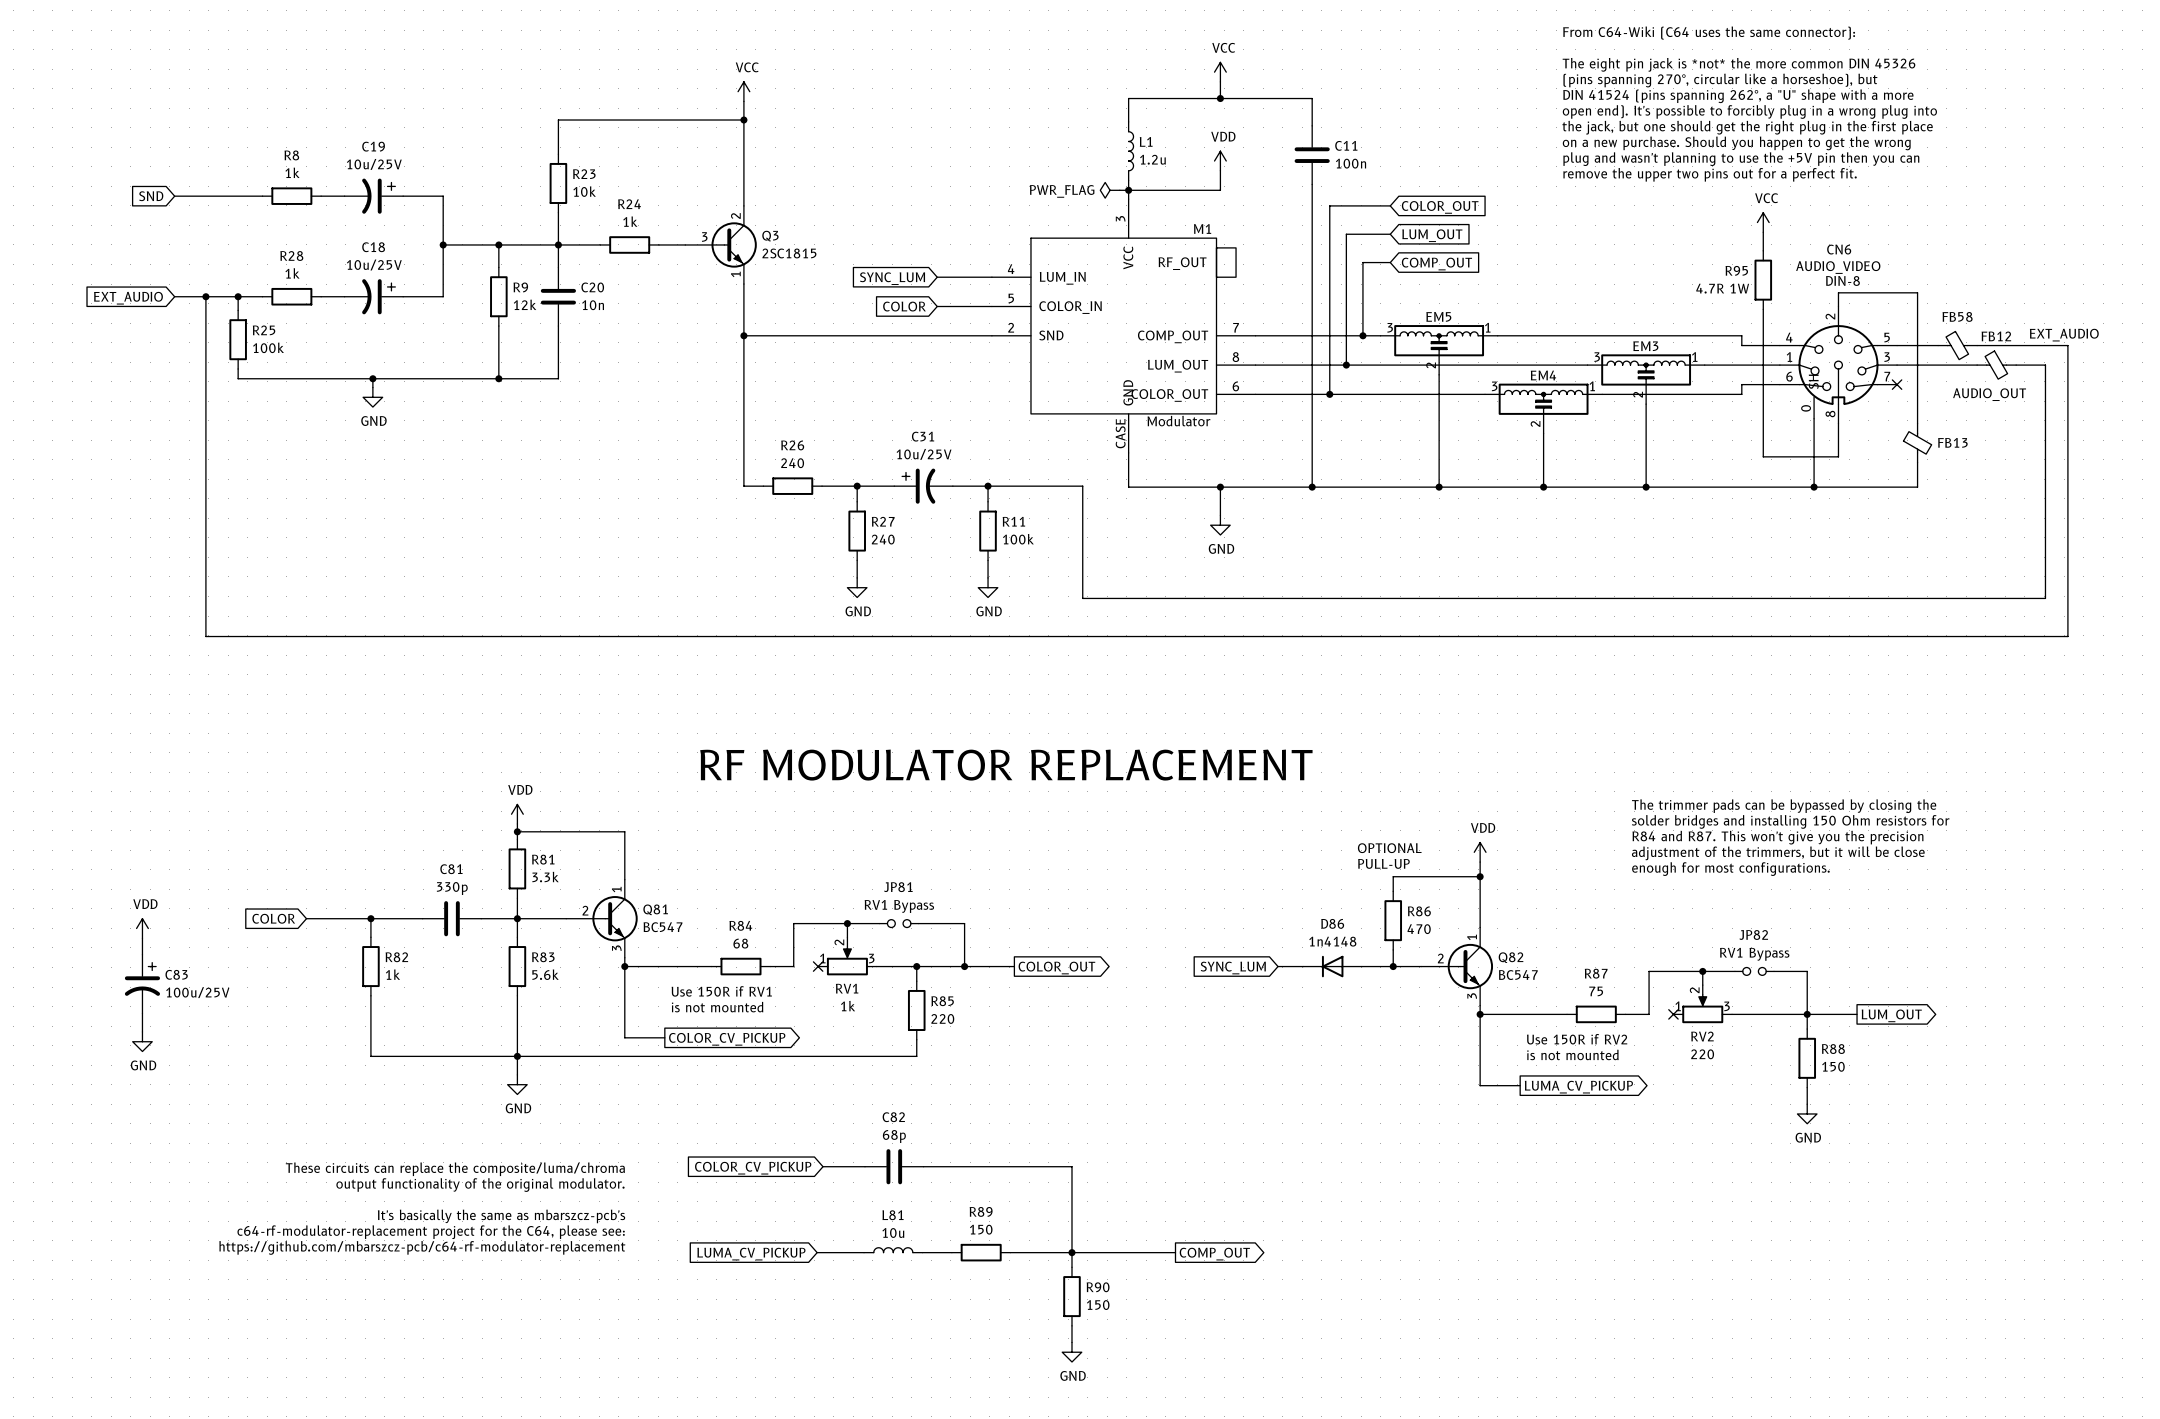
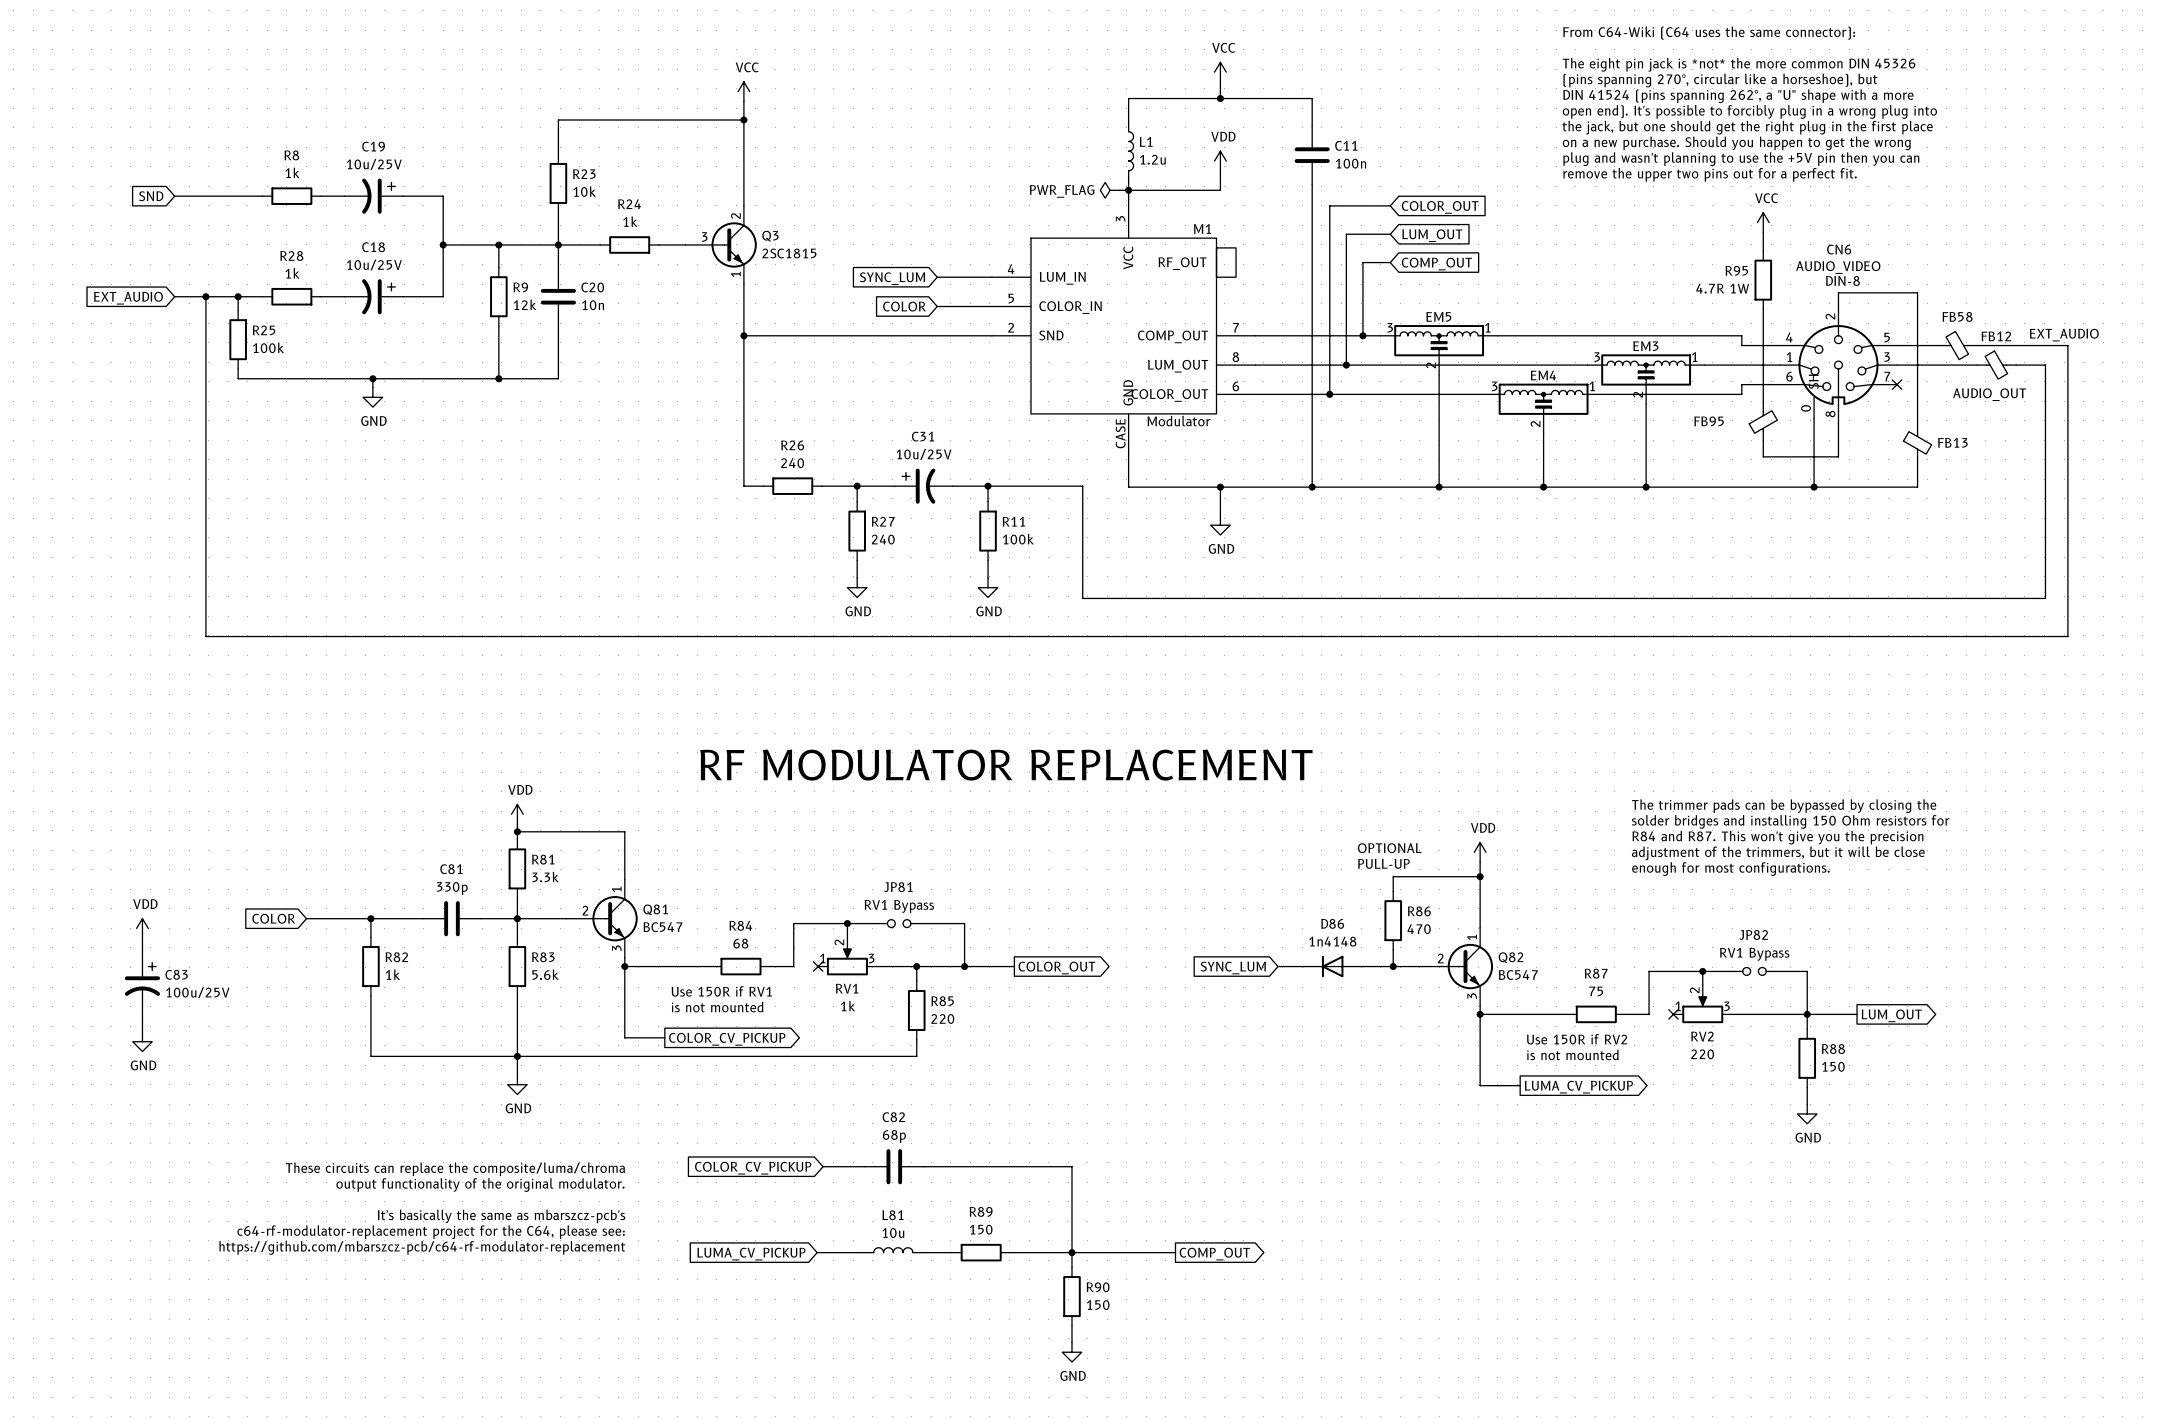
FB95: none -> (1763, 421)

